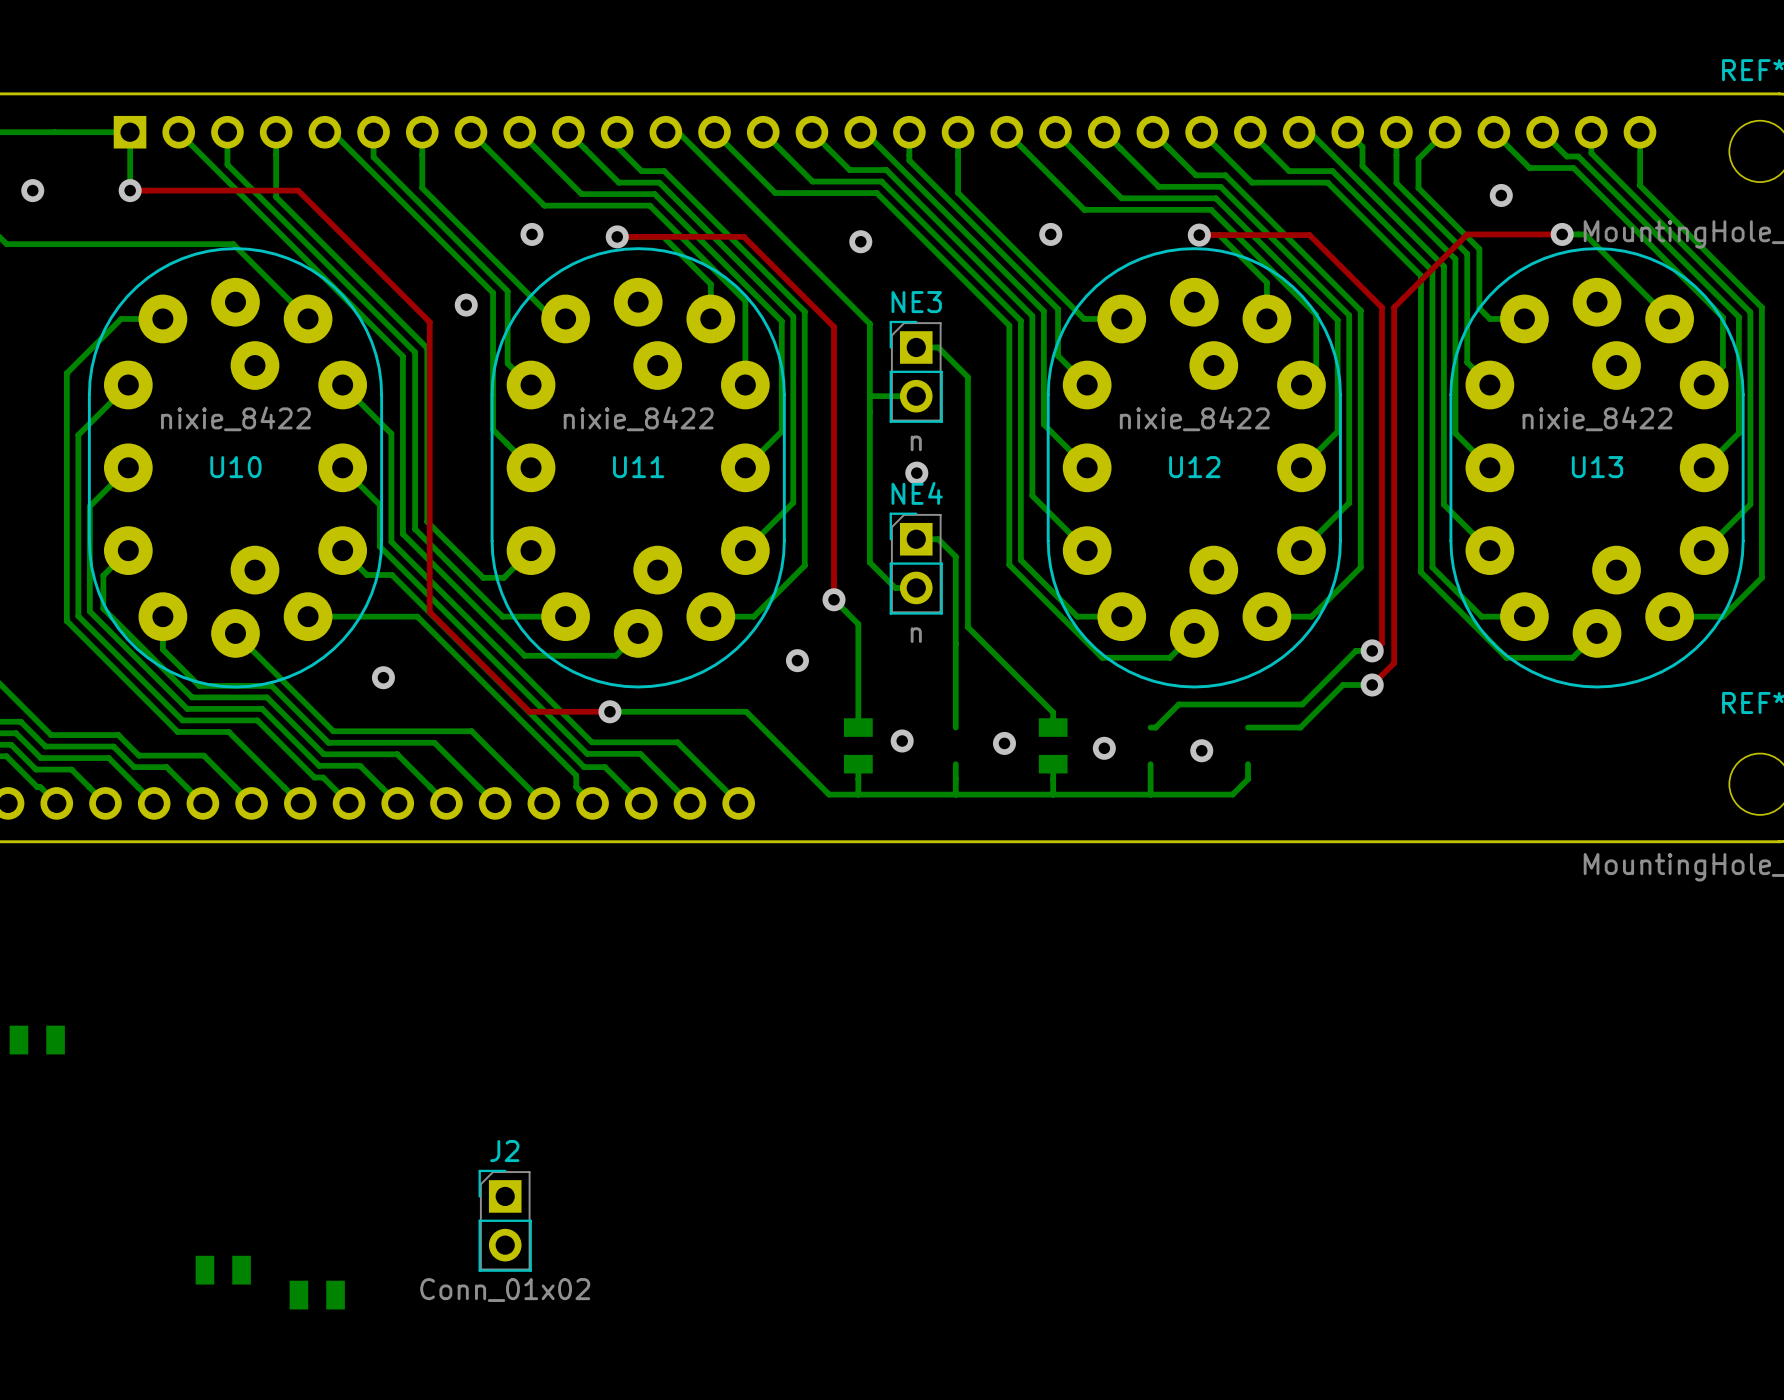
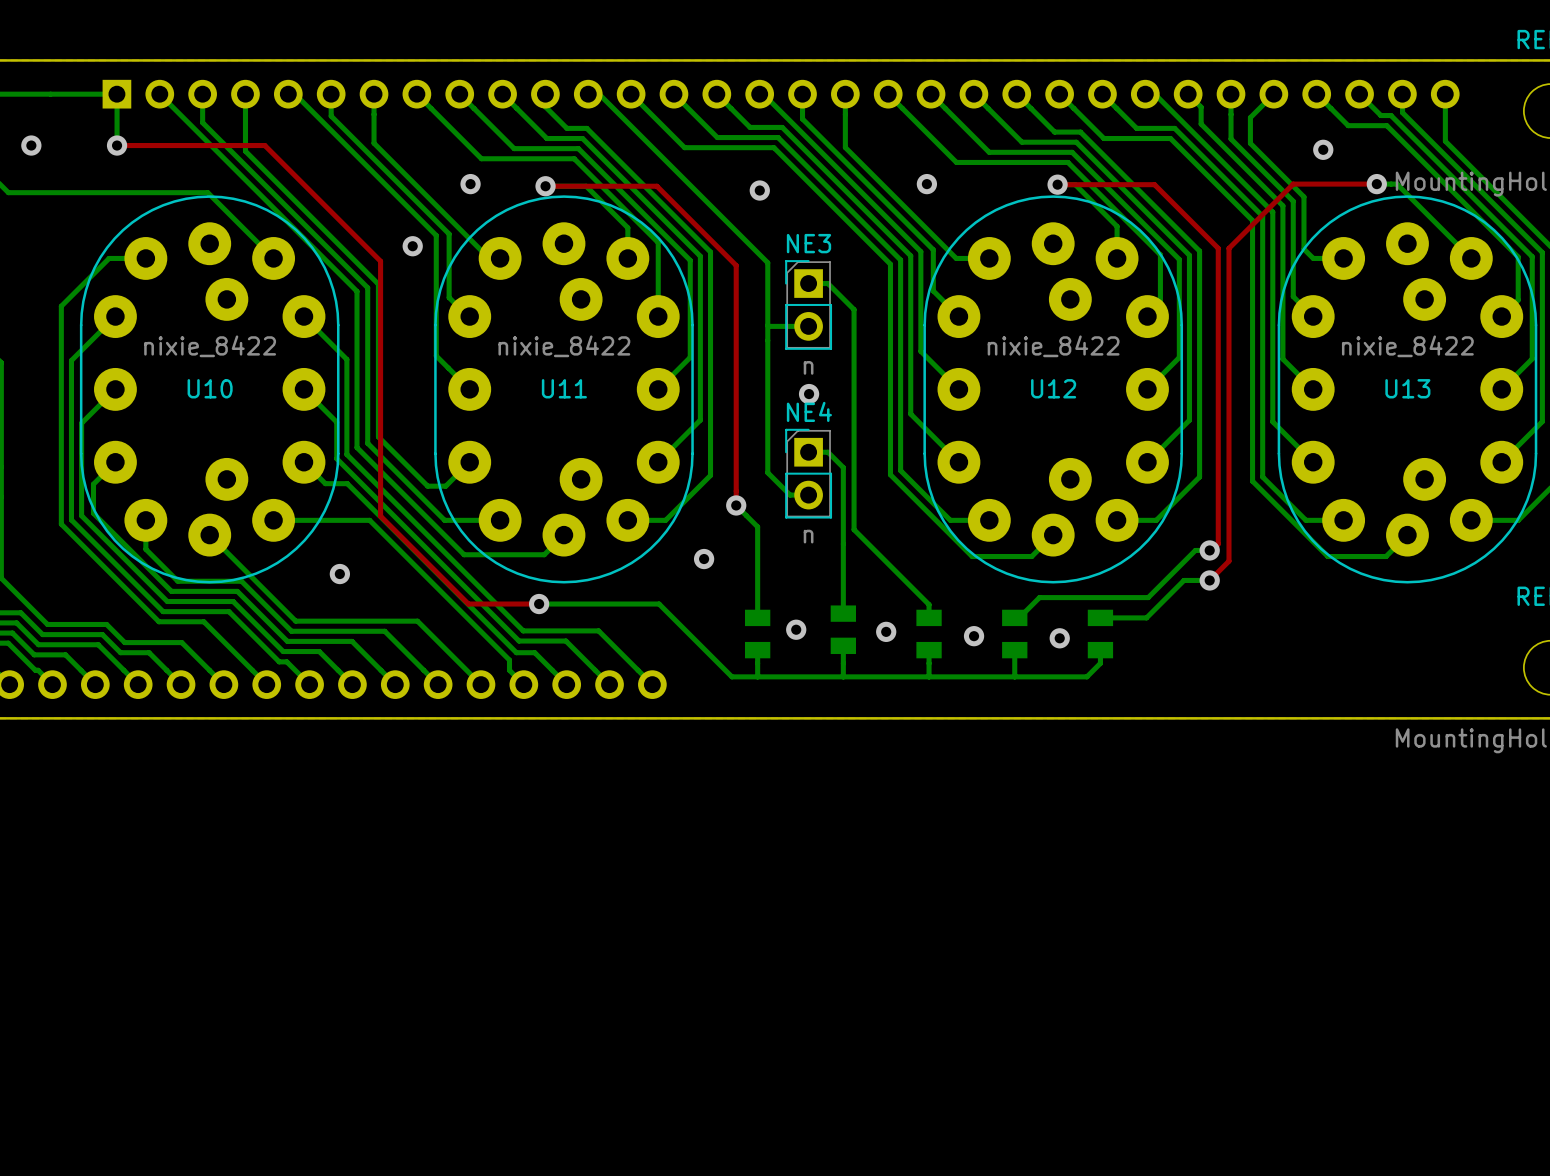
part: none -> (843, 629)
part: none -> (1014, 634)
part: none -> (1100, 634)
part: (37, 1040) -> none
J2: Conn_01x02 (505, 1220) -> none
part: (223, 1270) -> none
part: (317, 1295) -> none

